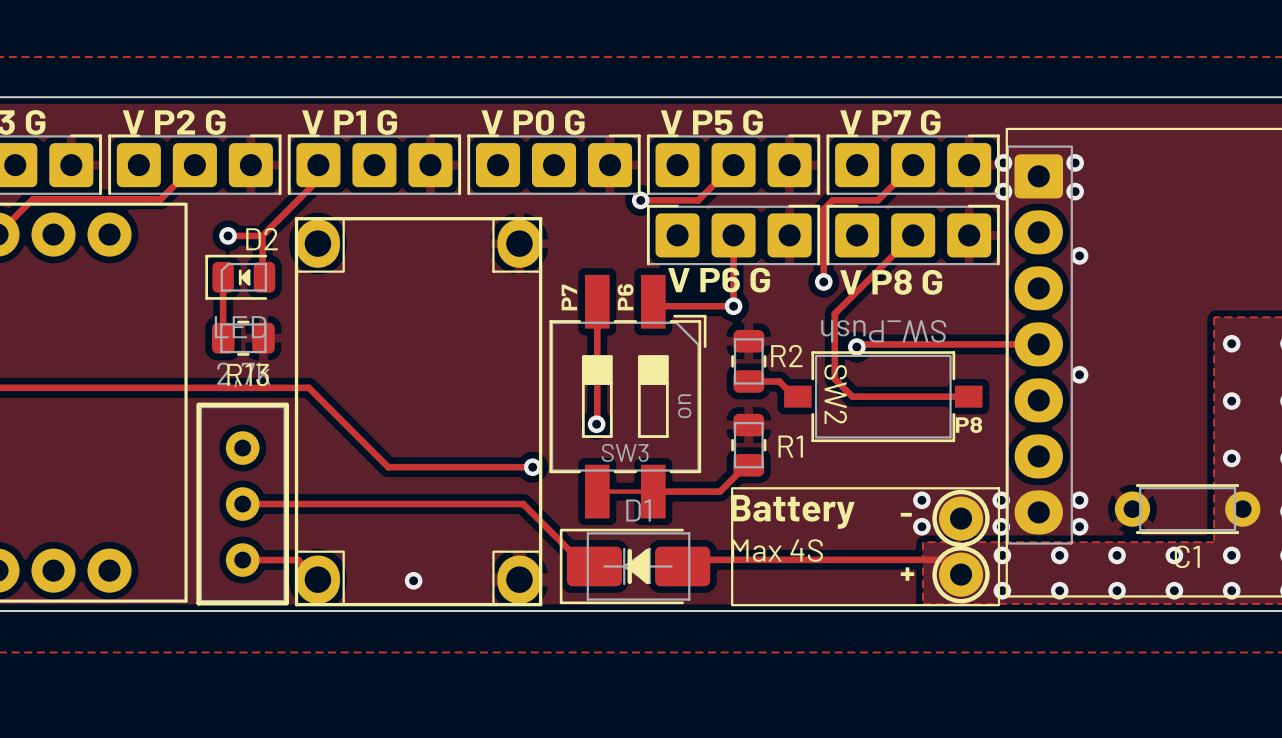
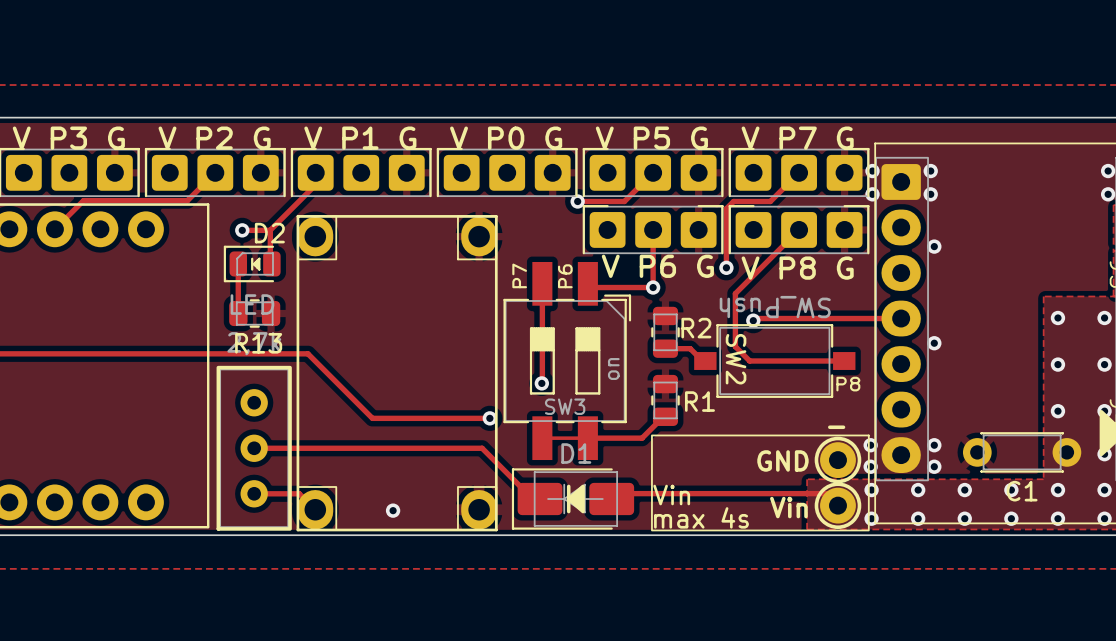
via: (921, 500) -> none
text: Battery (792, 511) -> none
text position: - (906, 514) -> - (836, 427)
text: none -> GND (782, 460)
via: (921, 526) -> none
text: Max 4S (777, 550) -> Vin (671, 495)
text: + (907, 574) -> none
text: none -> Vin (788, 507)
text: none -> max 4s (701, 517)

